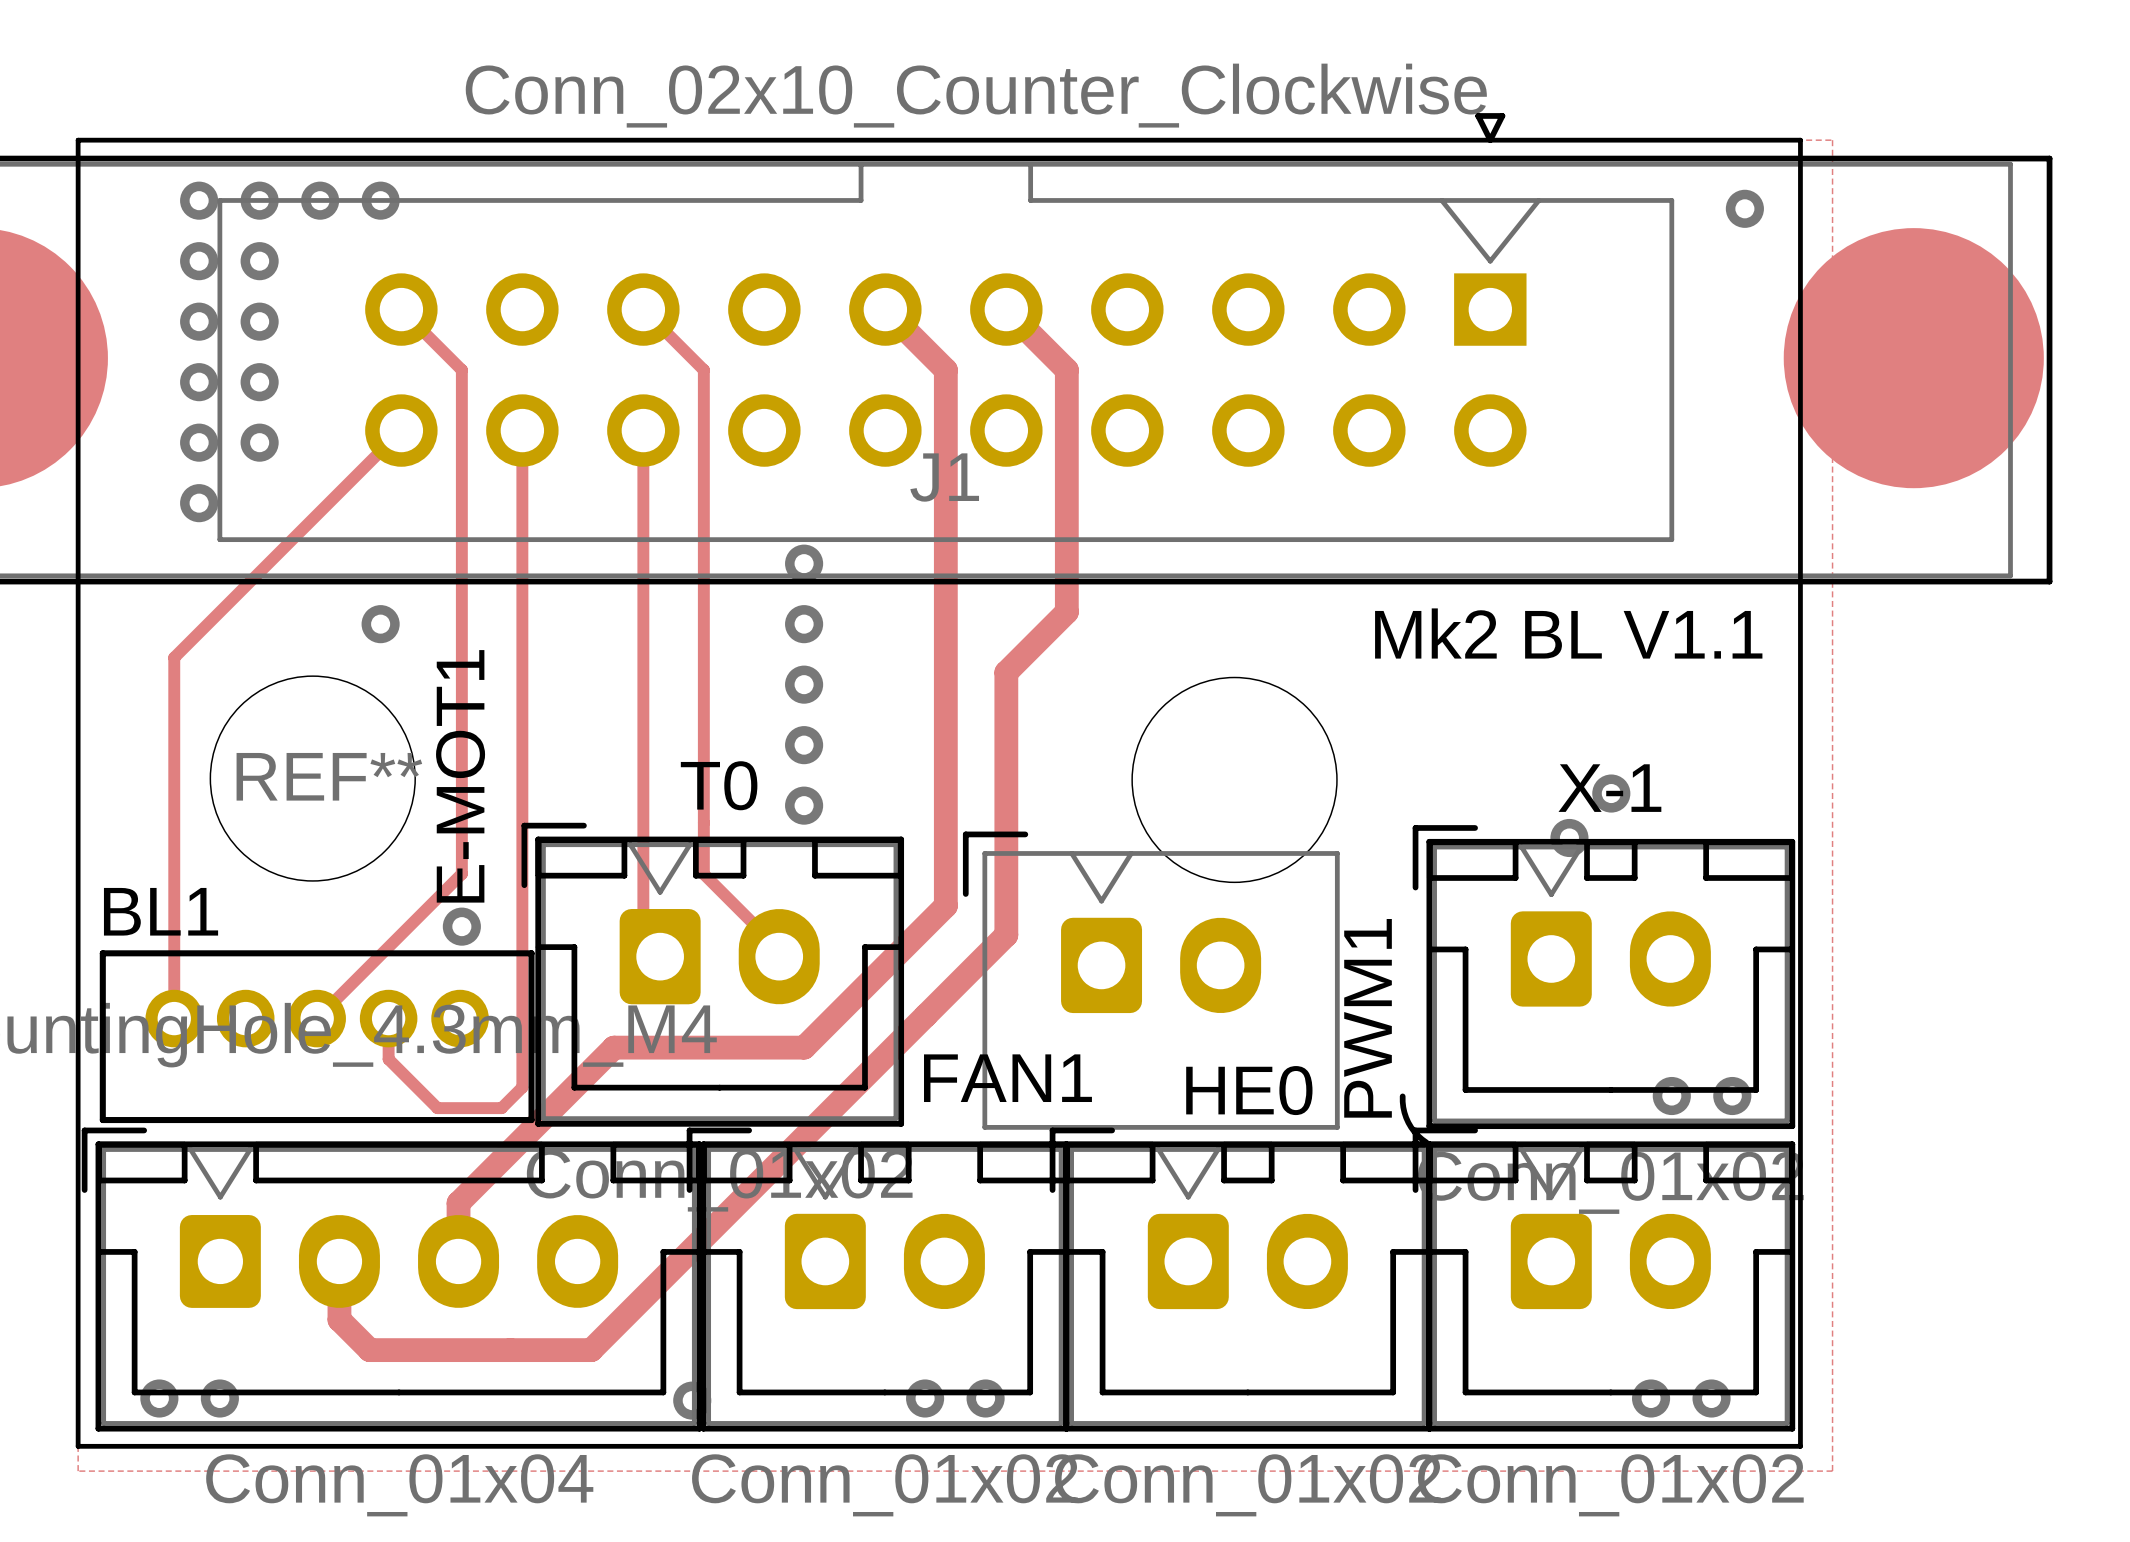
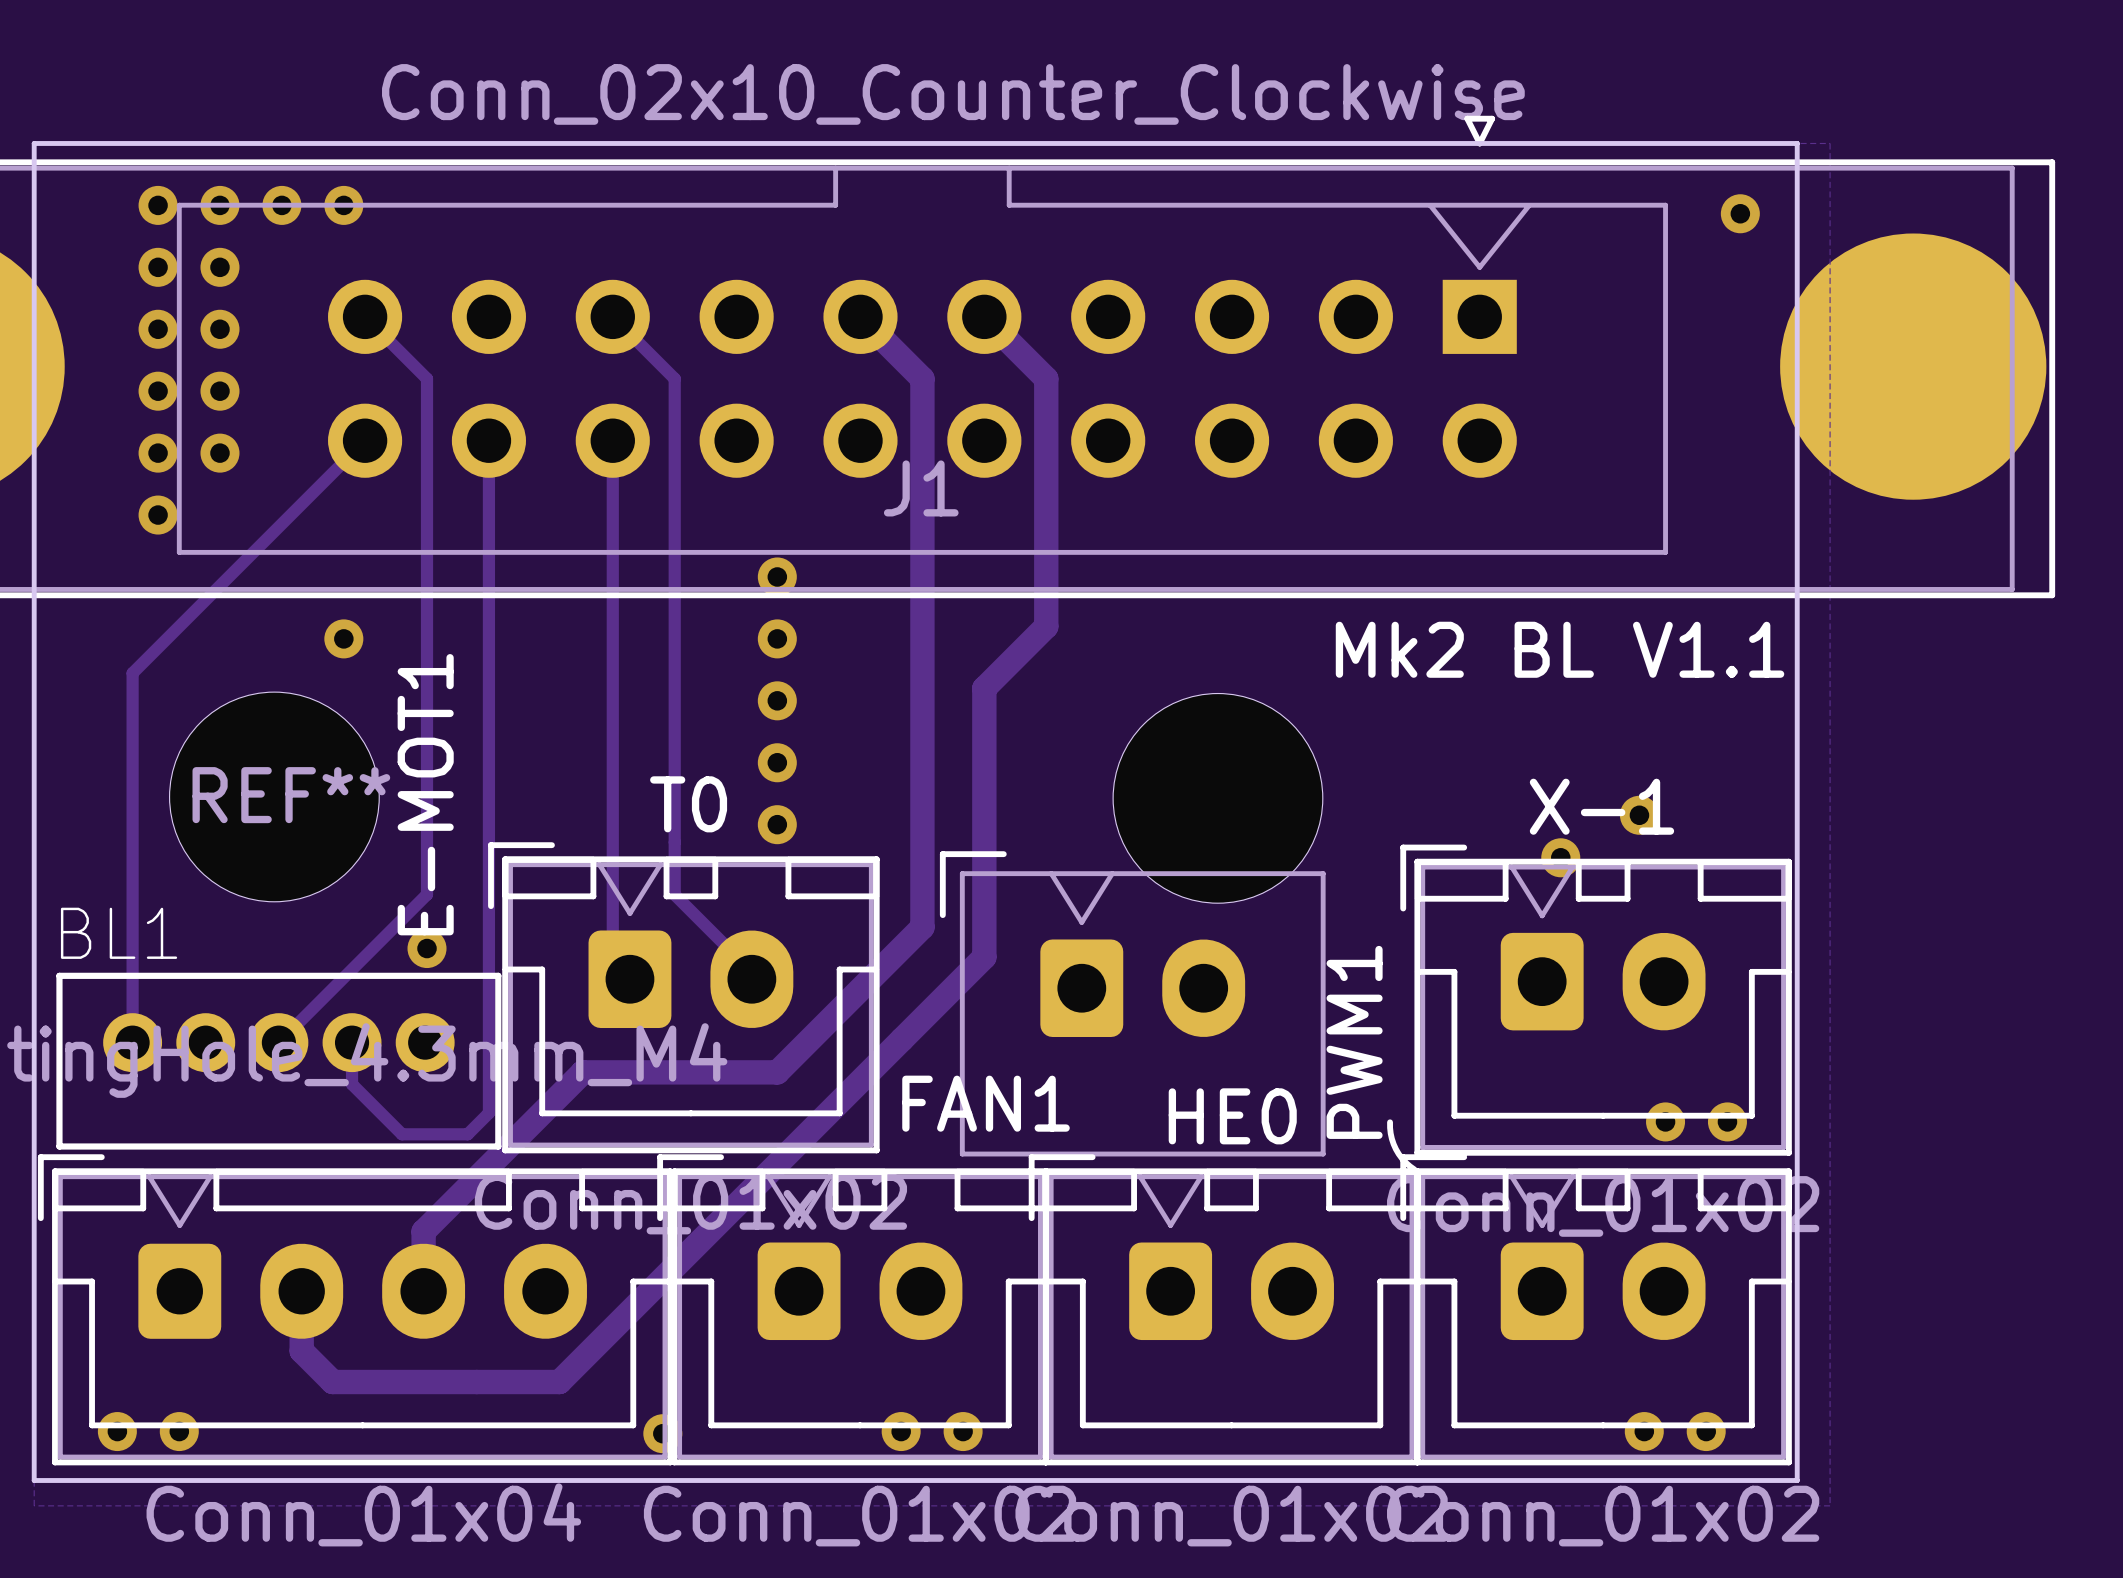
via position: (1611, 793) -> (1639, 815)

